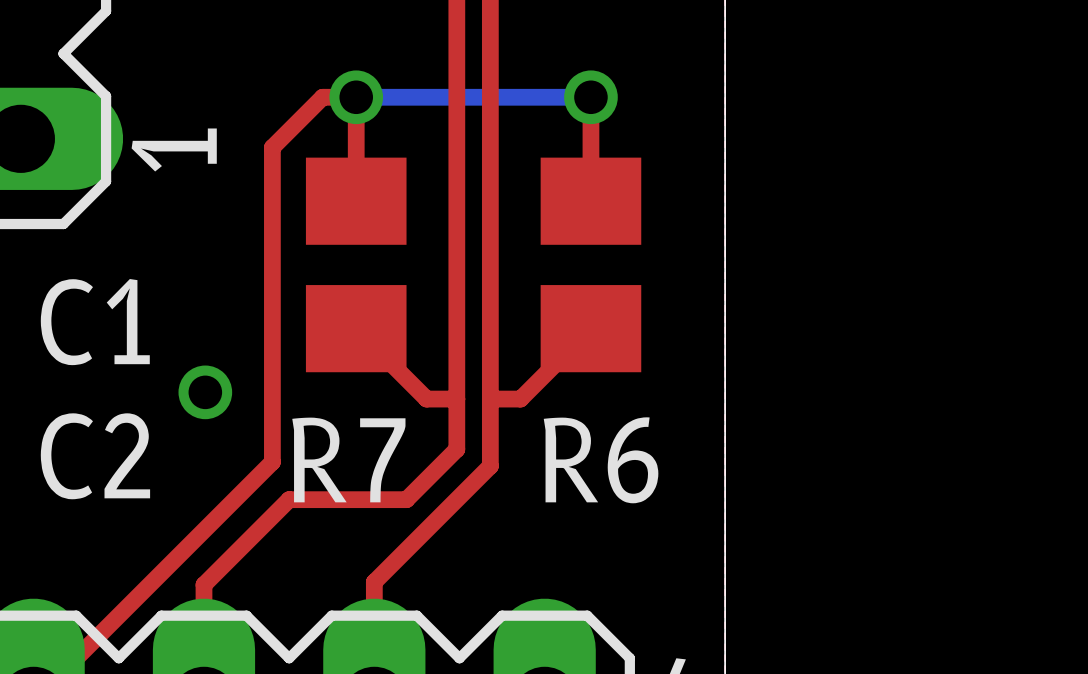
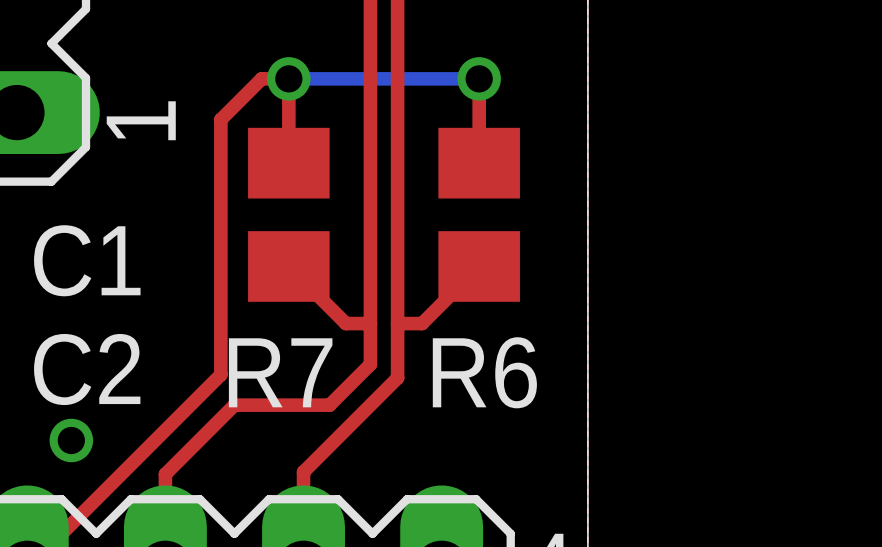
via position: (205, 392) -> (71, 440)

